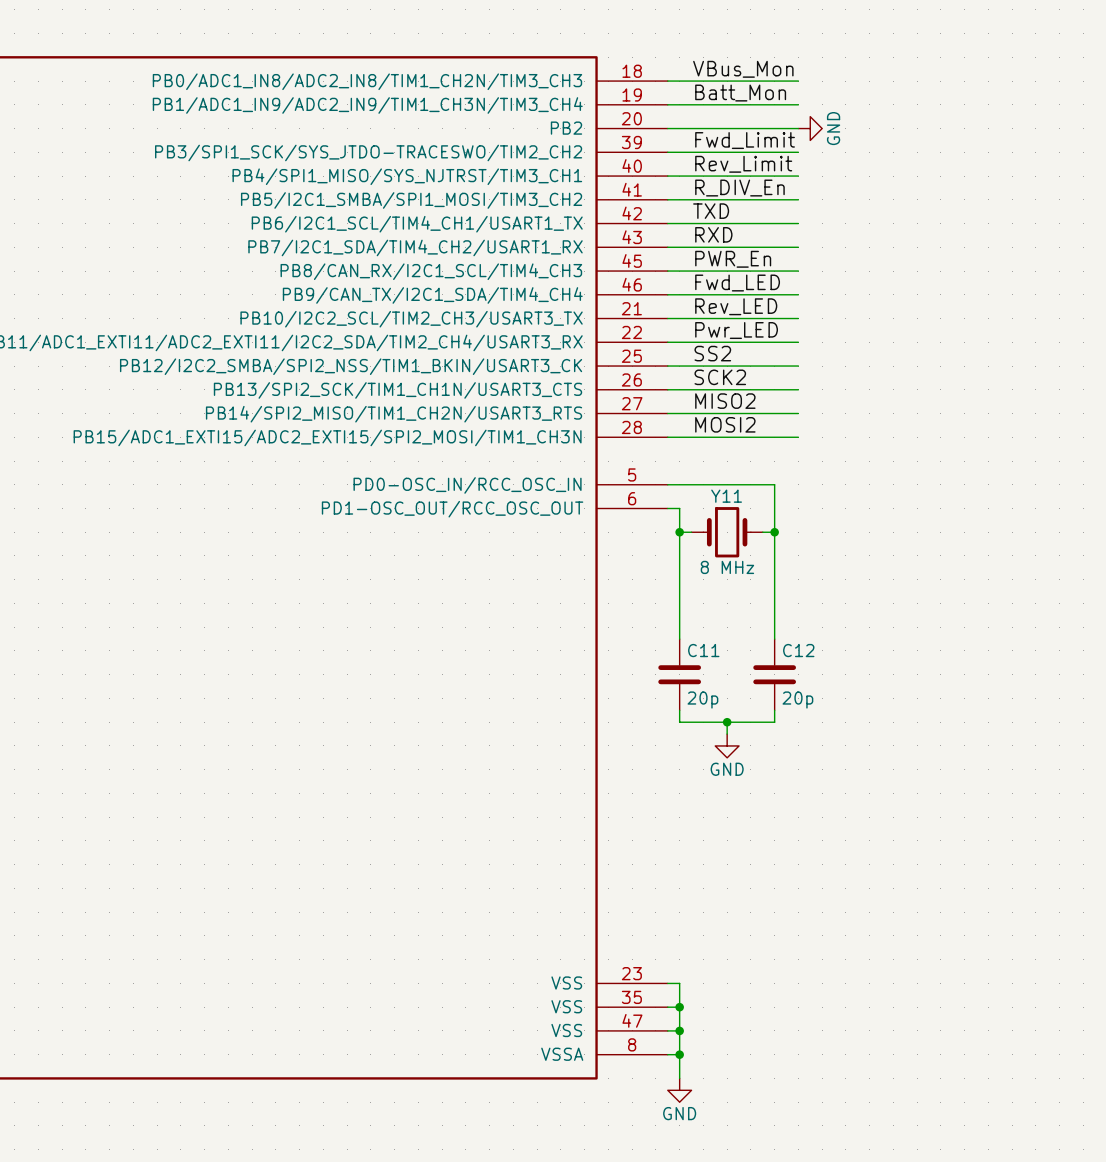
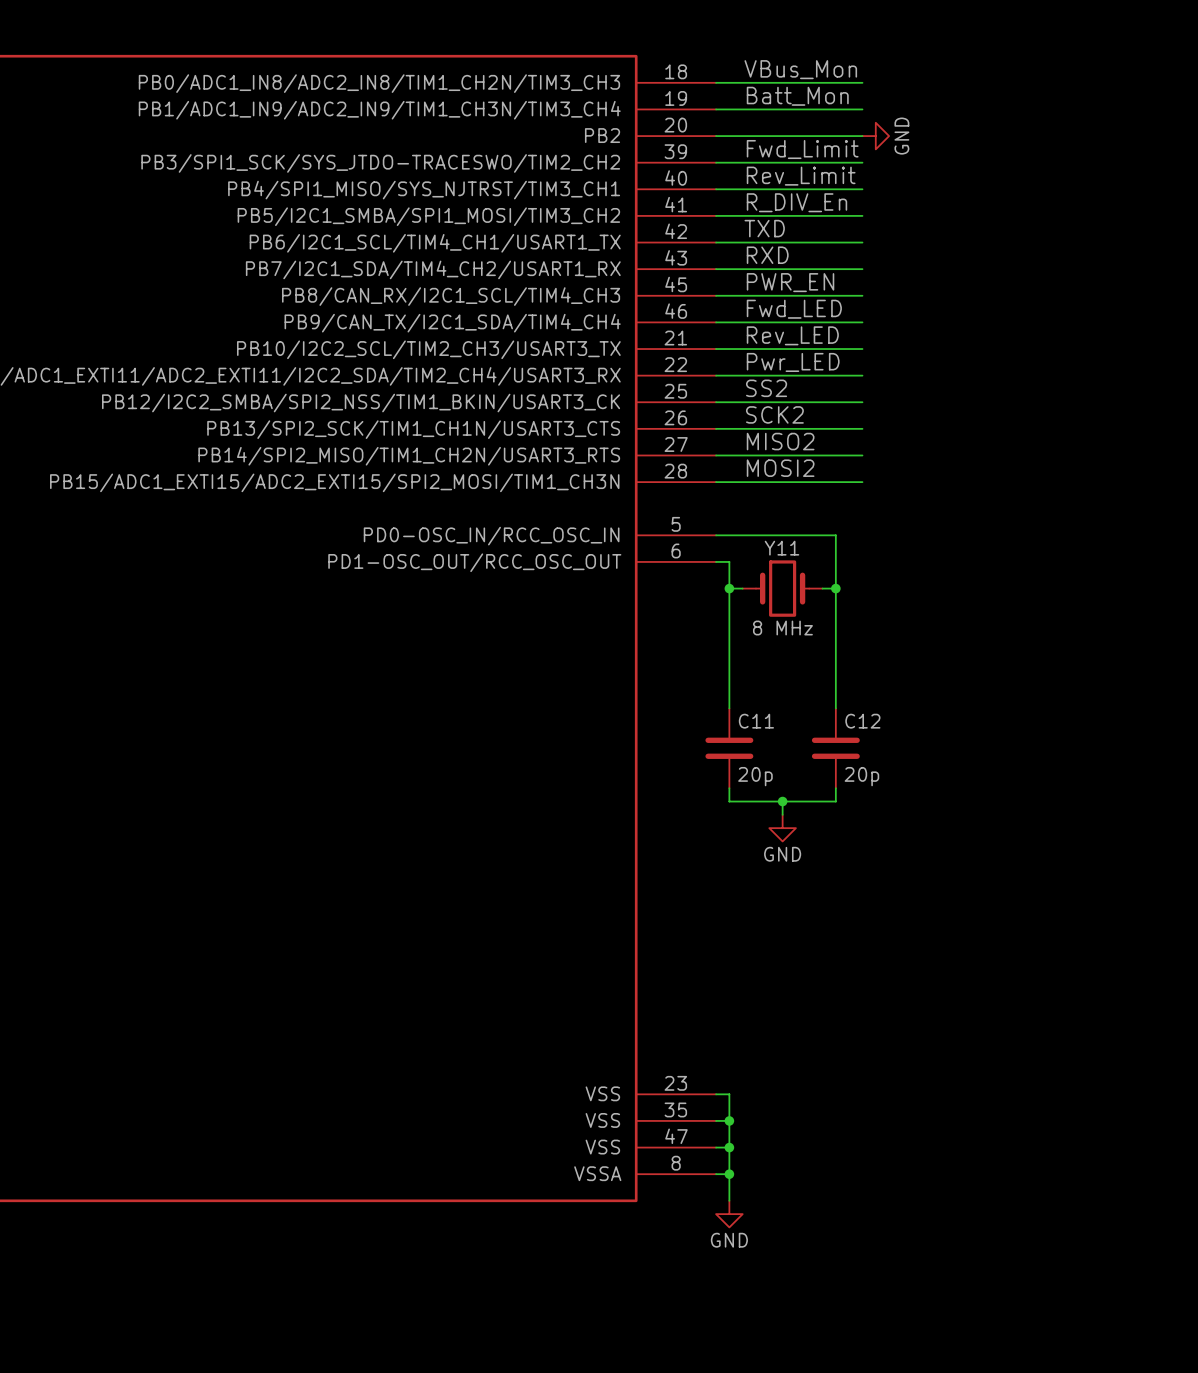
label: PWR_En (733, 259) -> PWR_EN (790, 282)

